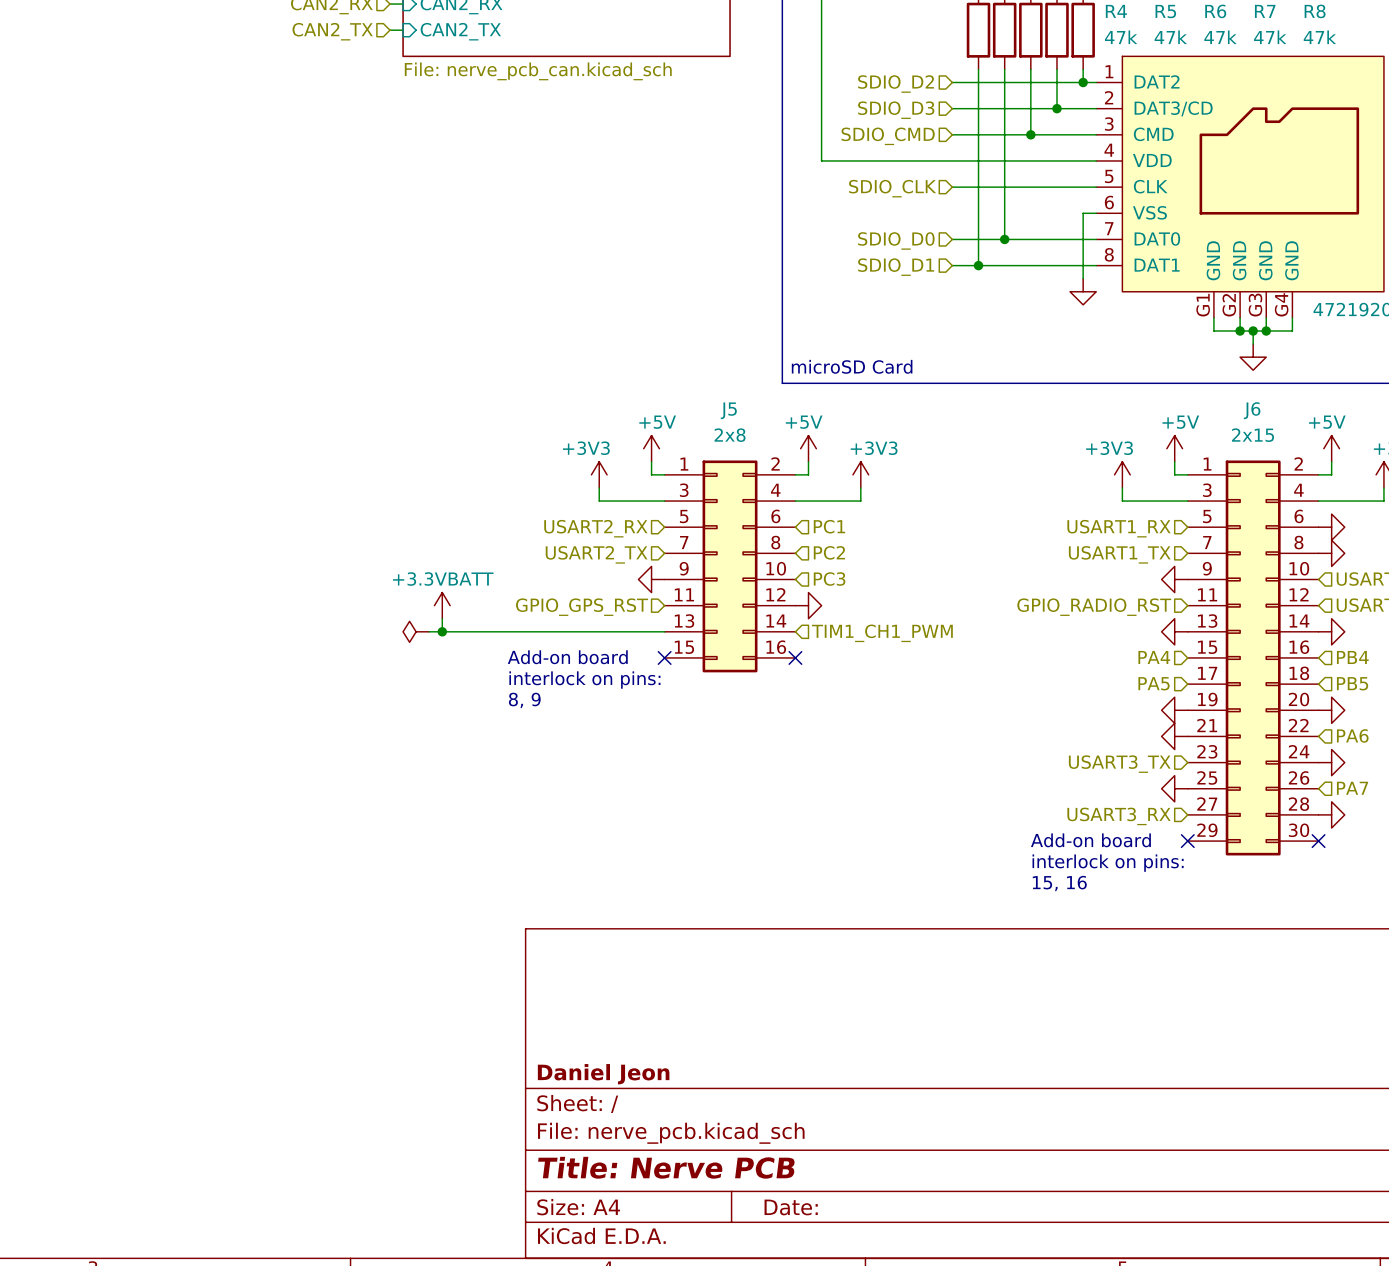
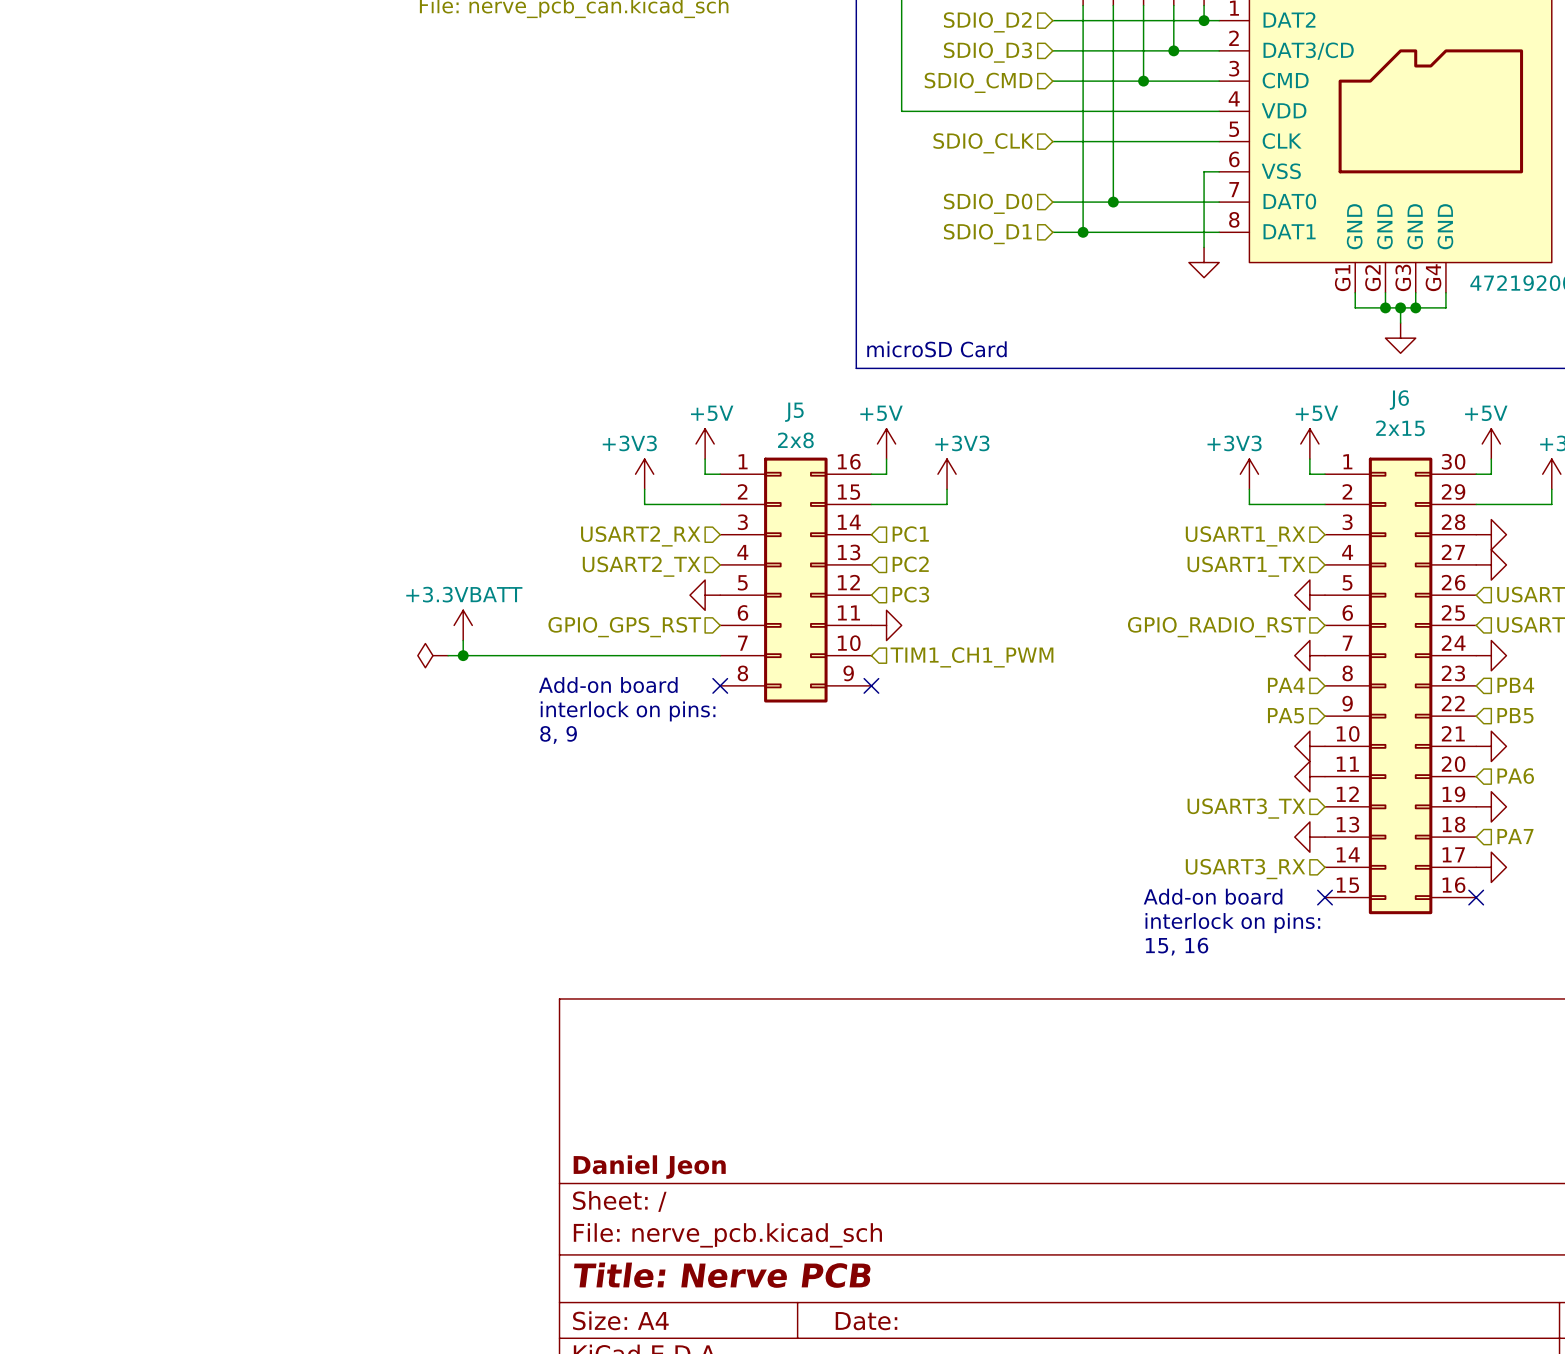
J5 symbol: [664, 460, 796, 673] -> [720, 457, 872, 703]
J6 symbol: [1187, 460, 1319, 856] -> [1325, 457, 1477, 915]

